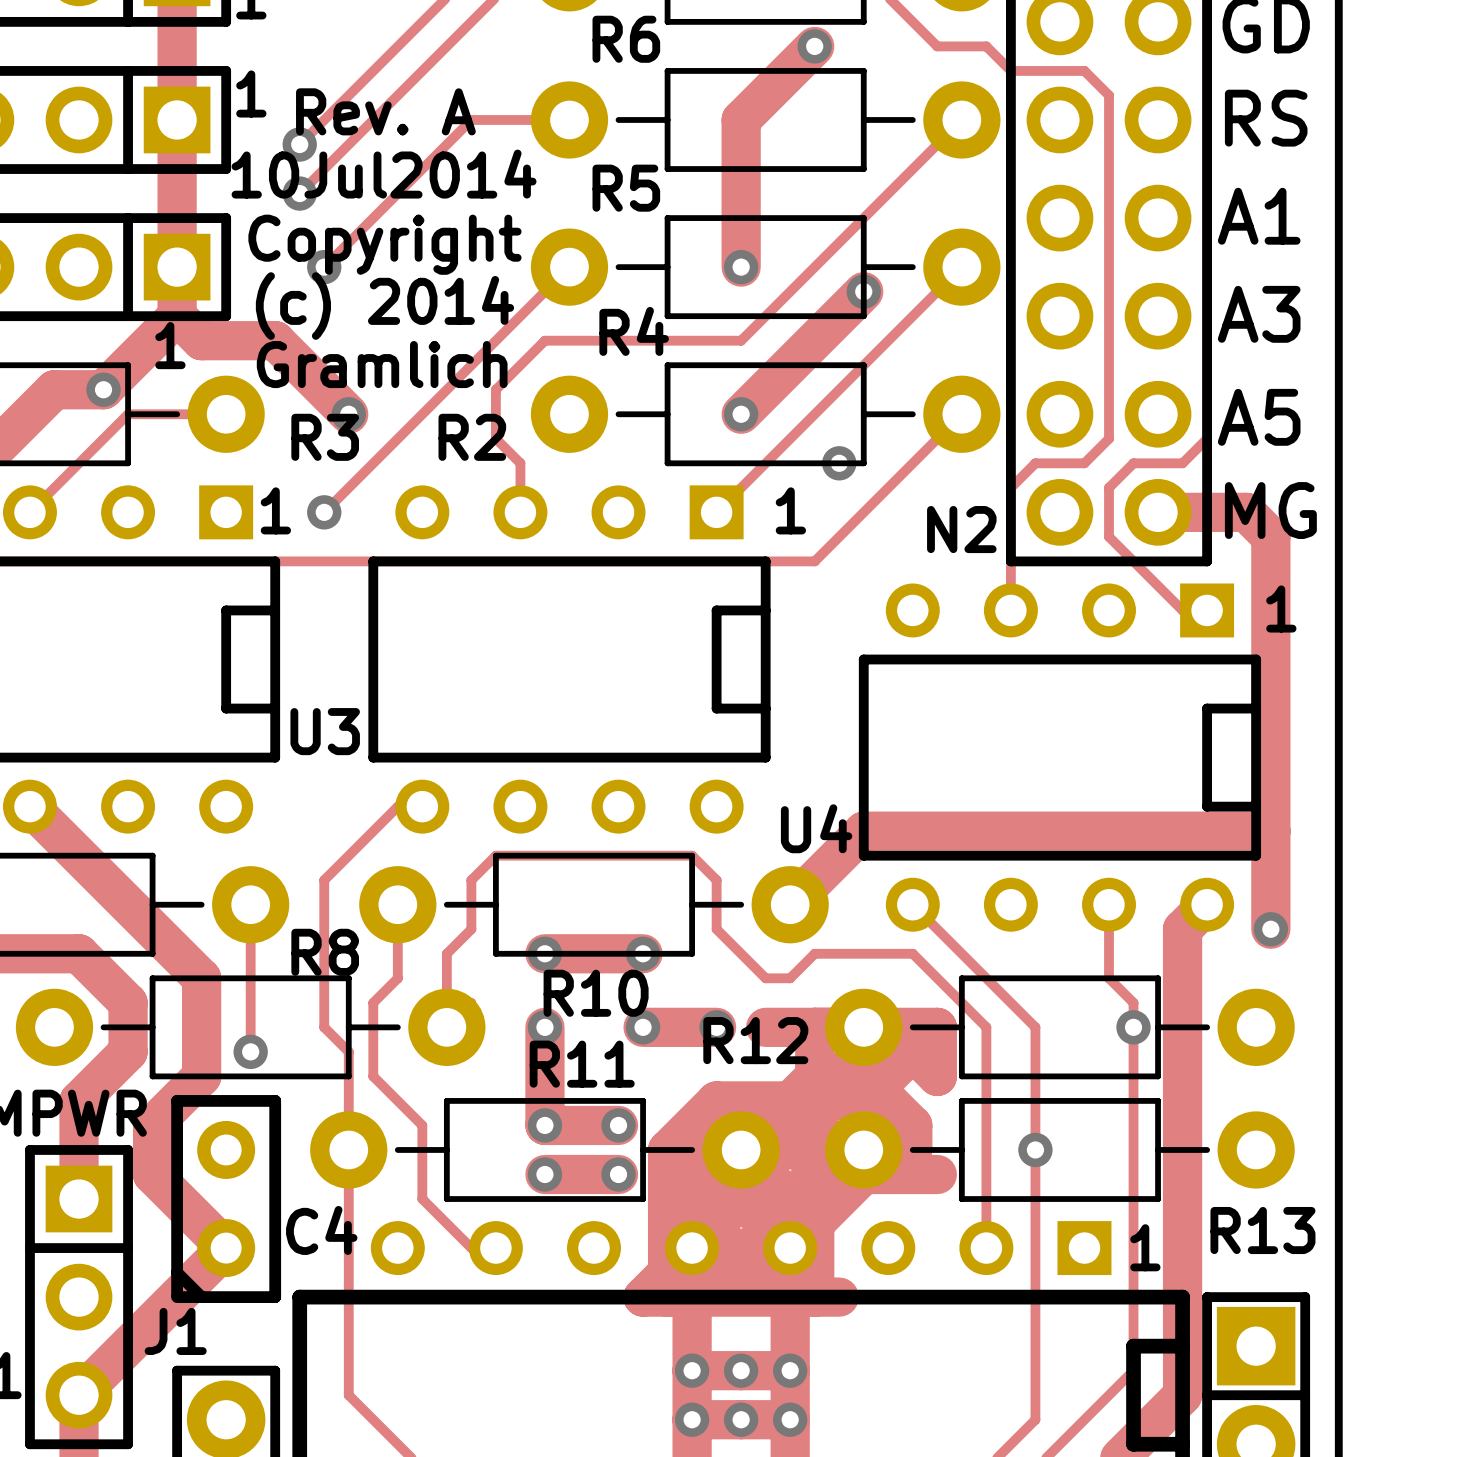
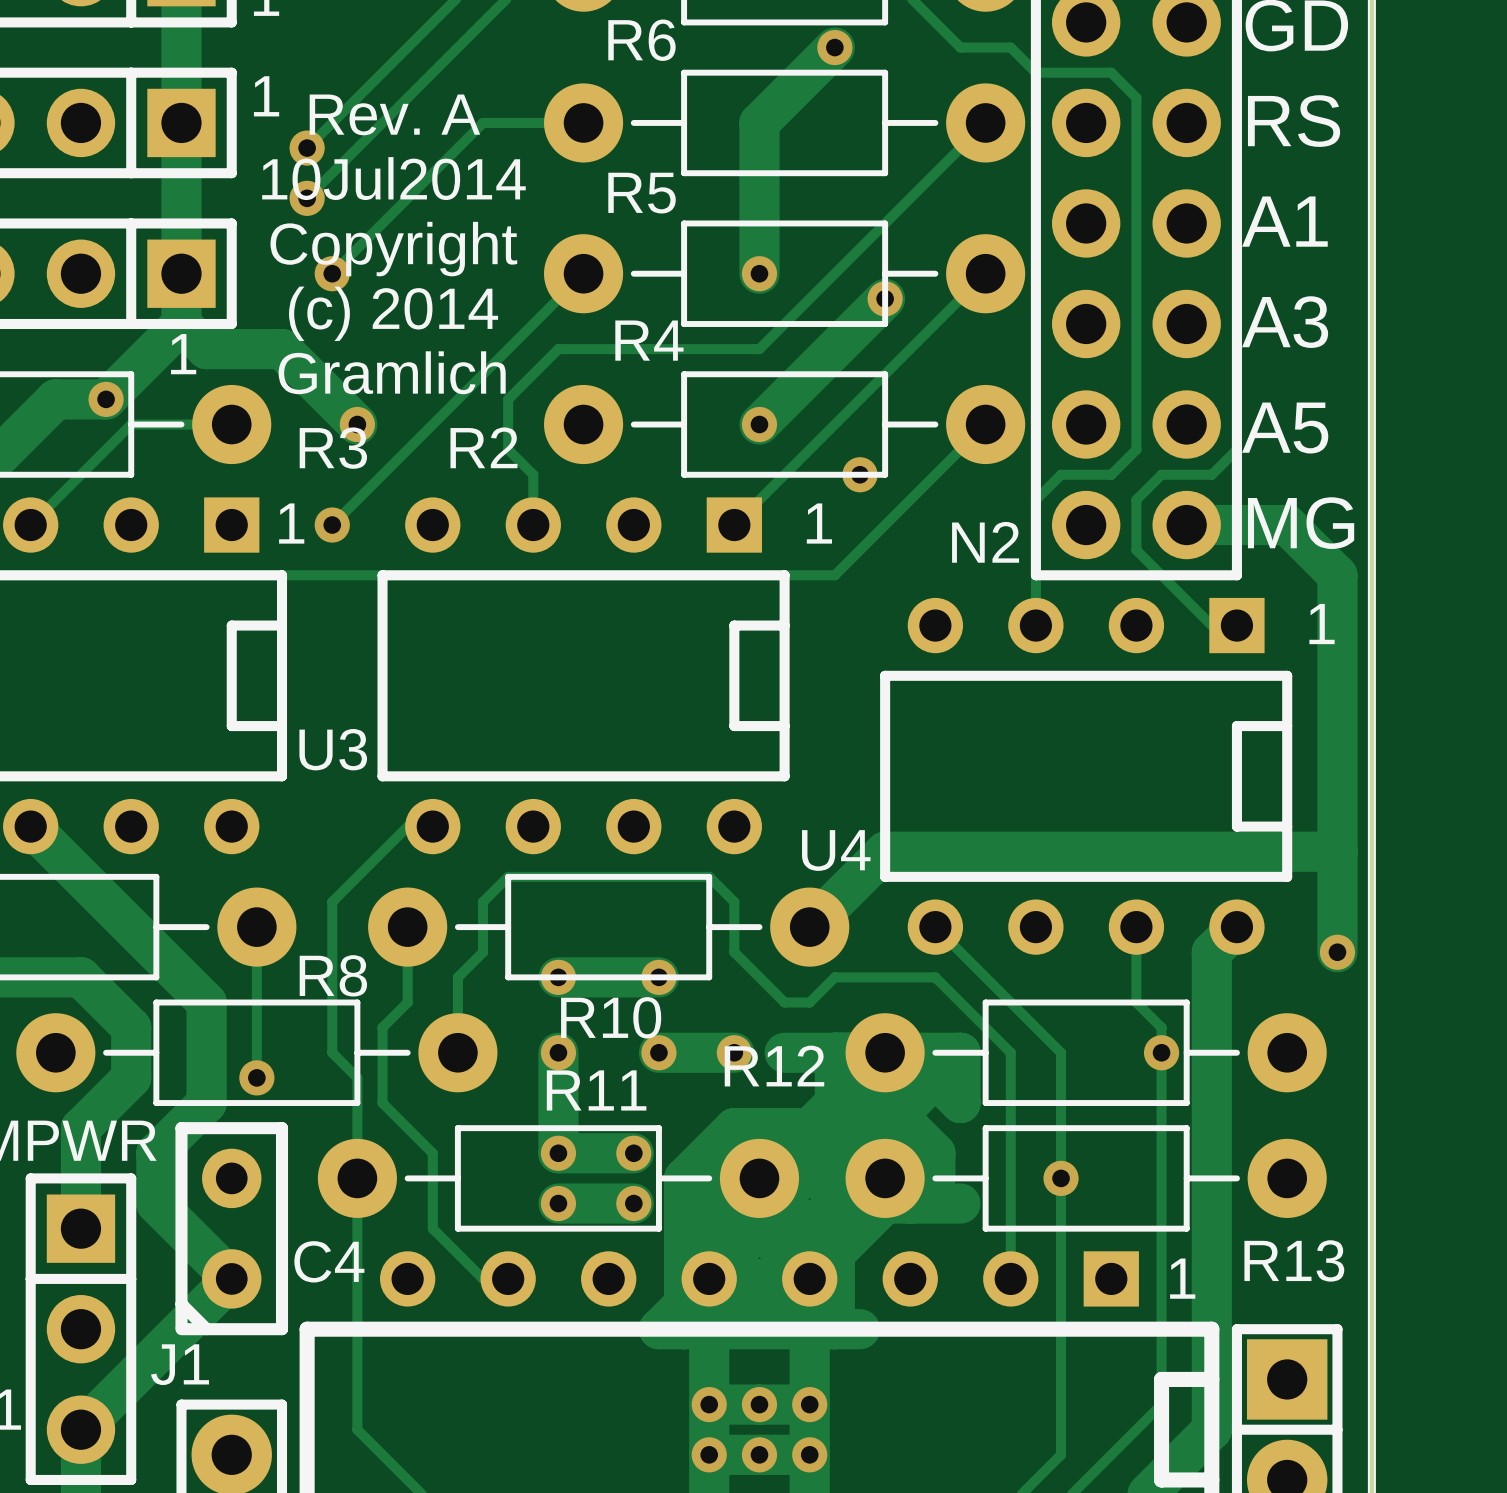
track: (1246, 512) (1270, 536) (1270, 929) -> (1277, 525) (1287, 525) (1337, 575) (1337, 952)
via position: (1270, 929) -> (1337, 952)

